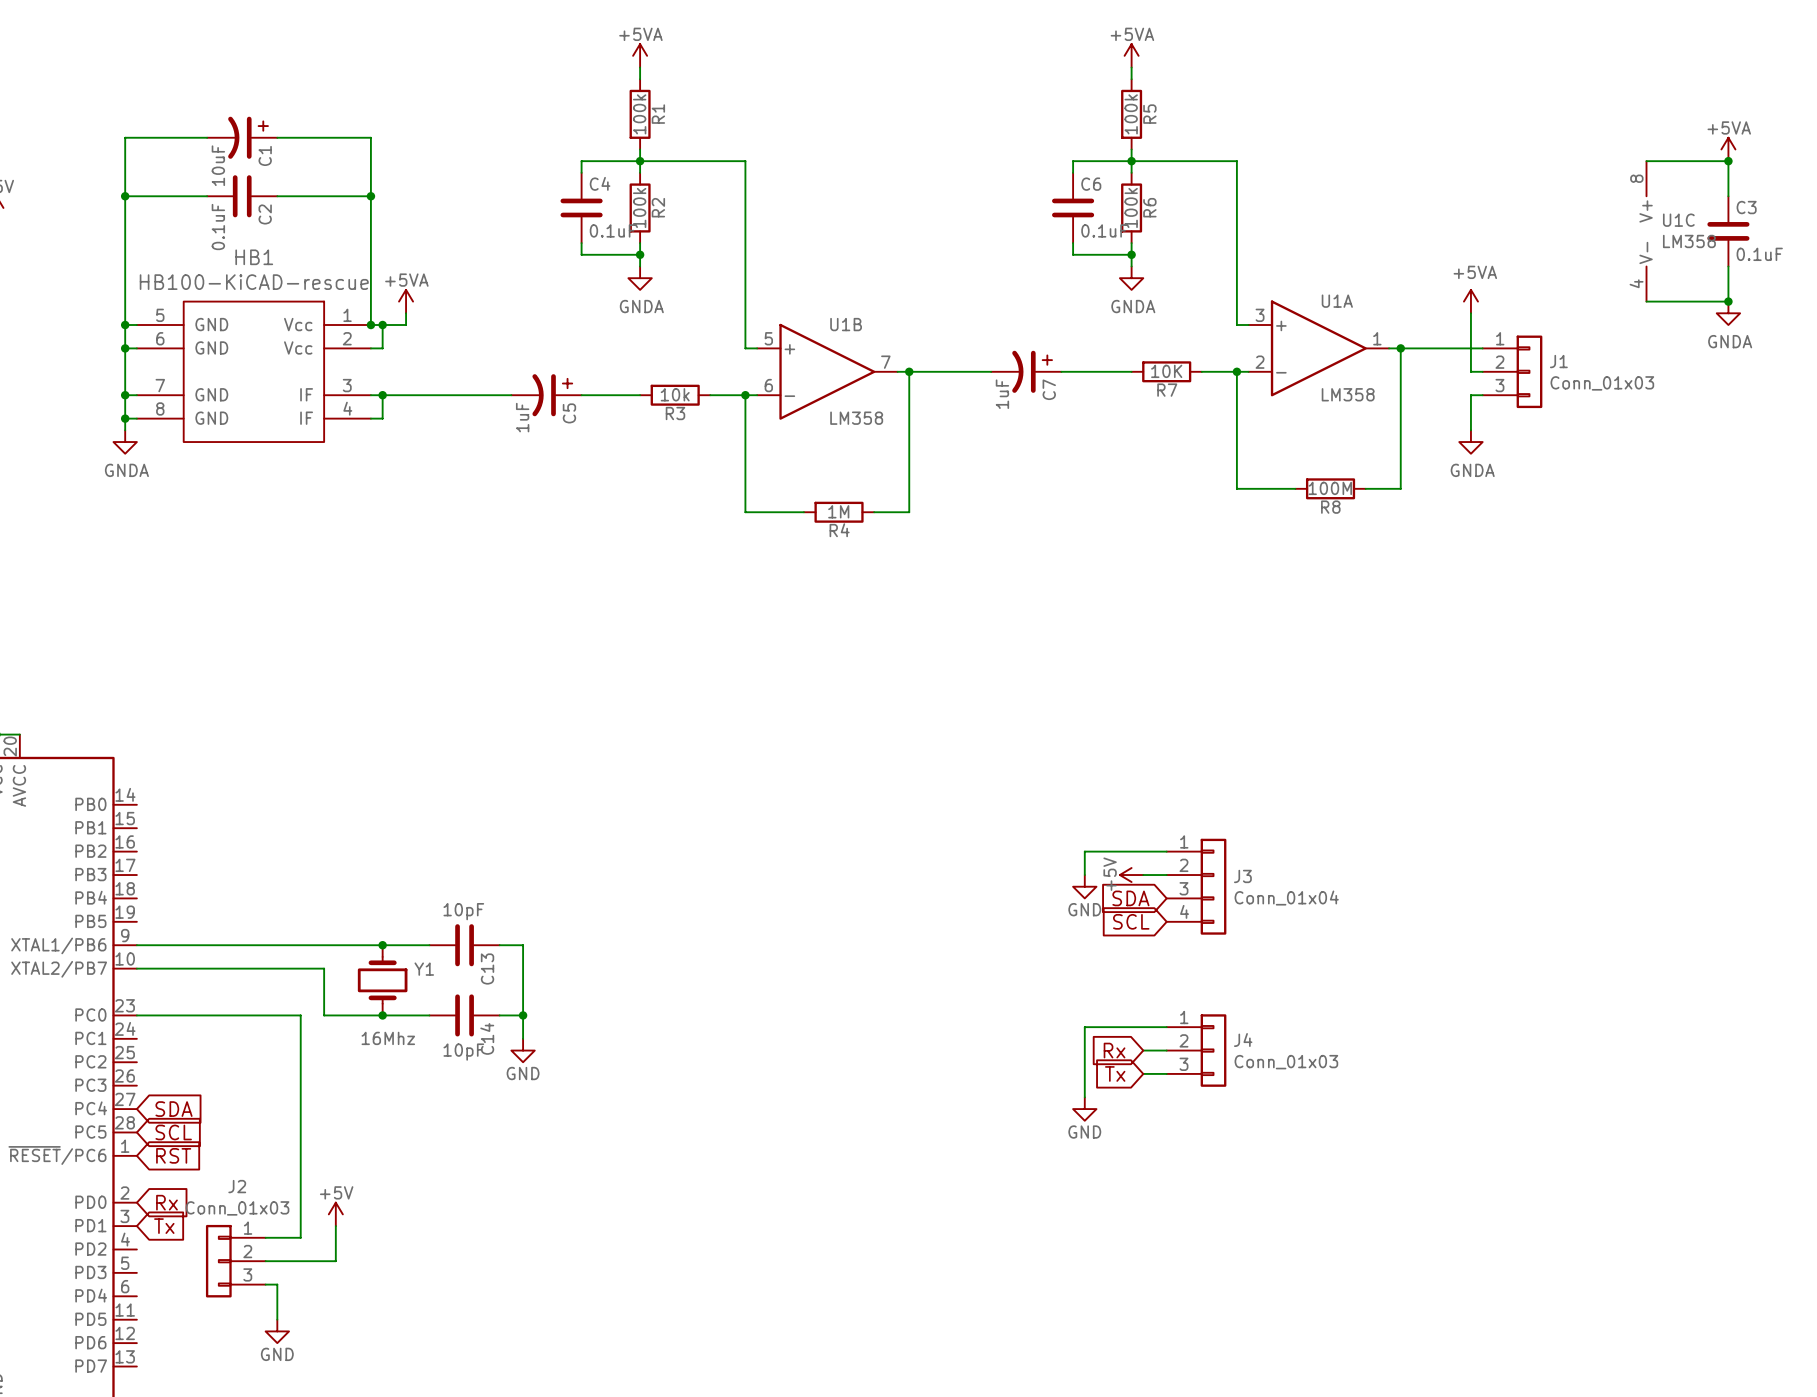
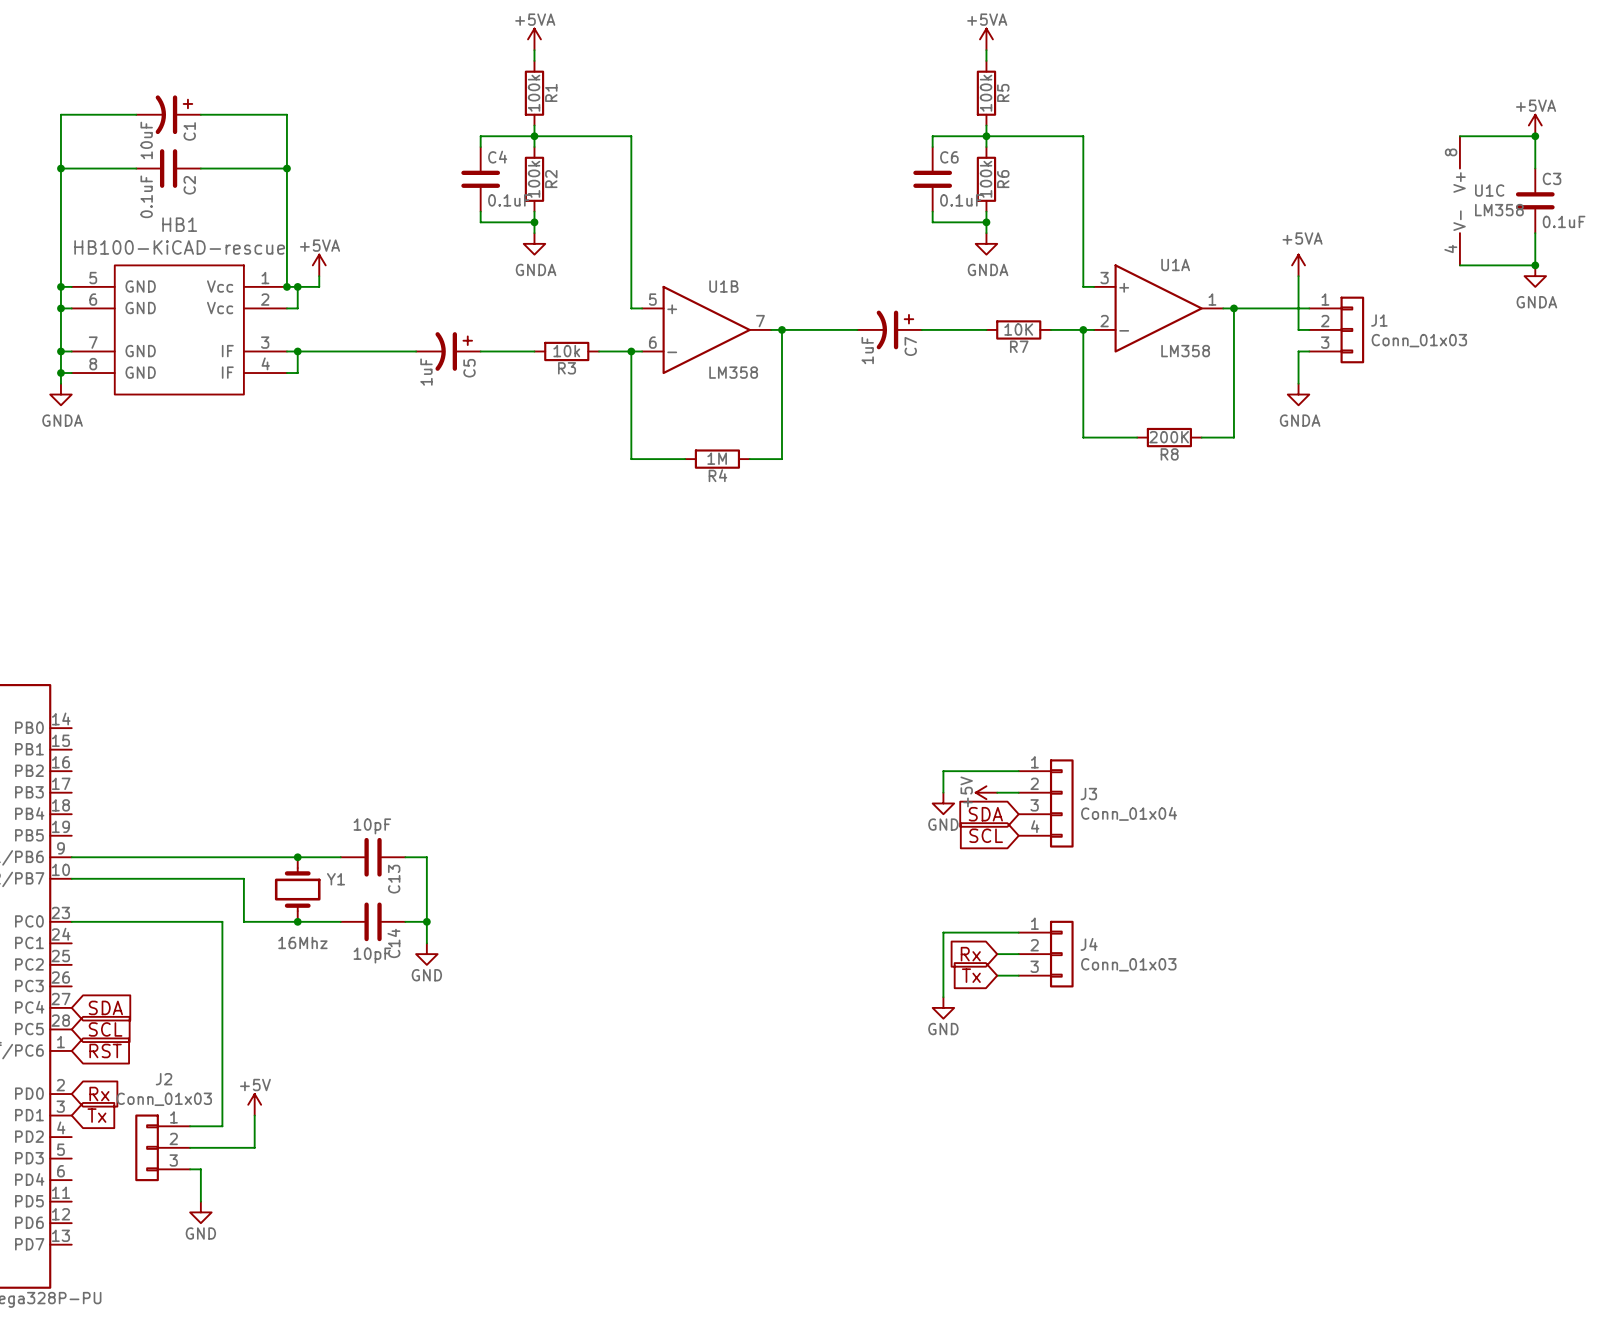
R8 value: 100M (1330, 488) -> 200K (1169, 437)

